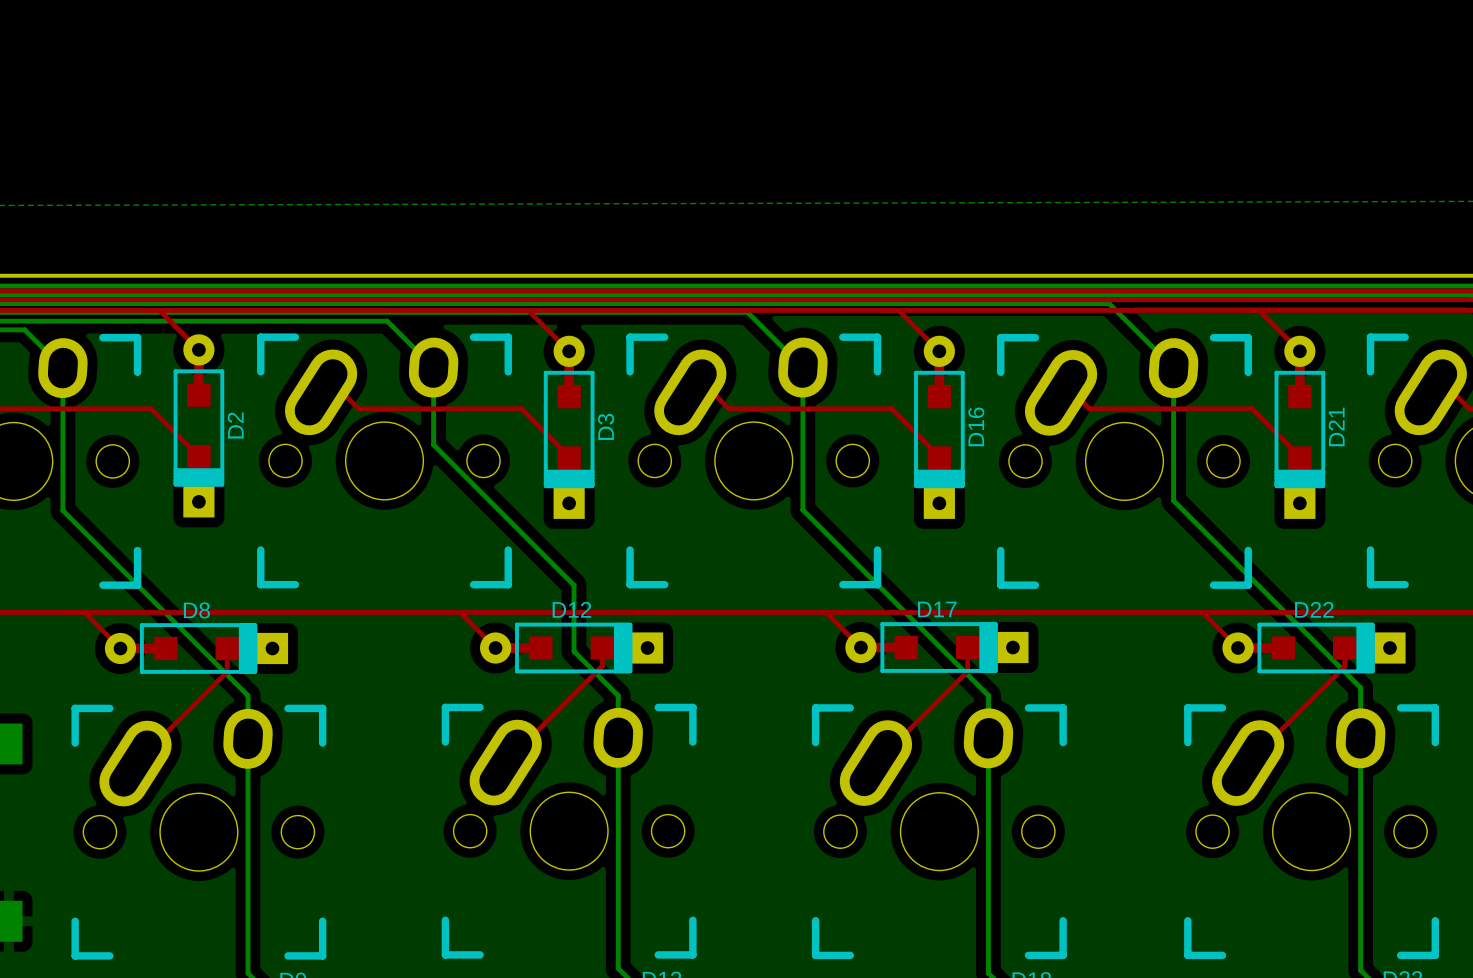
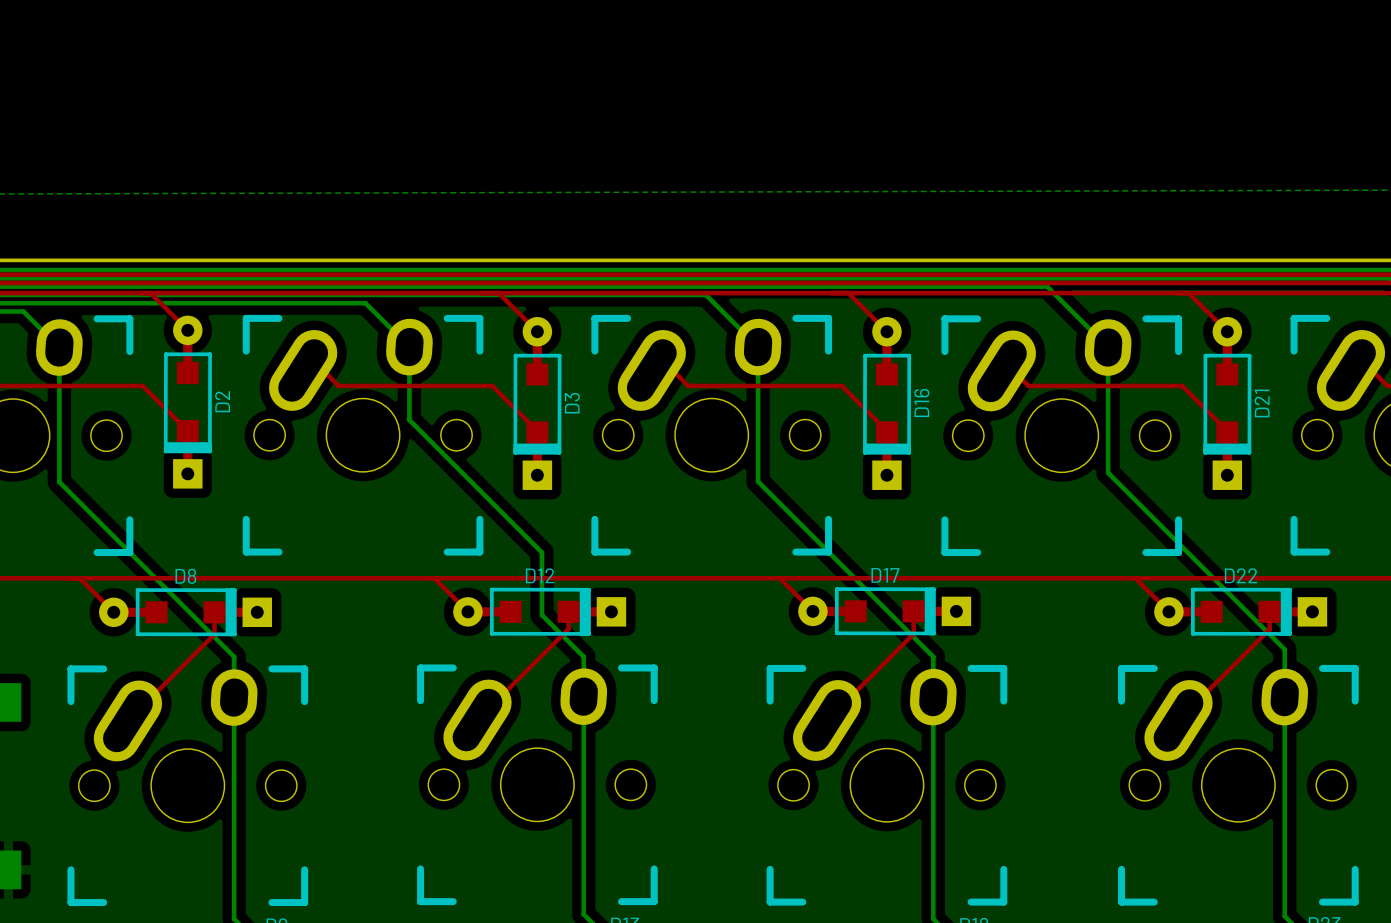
D2 footprint: [173, 334, 225, 518] -> [163, 315, 212, 489]
D3 footprint: [543, 335, 595, 519] -> [513, 317, 562, 490]
D16 footprint: [914, 335, 965, 519] -> [863, 317, 912, 490]
D21 footprint: [1274, 335, 1326, 519] -> [1203, 317, 1252, 490]
D12 footprint: [479, 622, 664, 674] -> [453, 587, 627, 636]
D17 footprint: [845, 622, 1029, 673] -> [798, 587, 972, 636]
D22 footprint: [1222, 622, 1406, 674] -> [1154, 587, 1328, 636]
D8 footprint: [104, 623, 289, 674] -> [99, 588, 272, 637]

